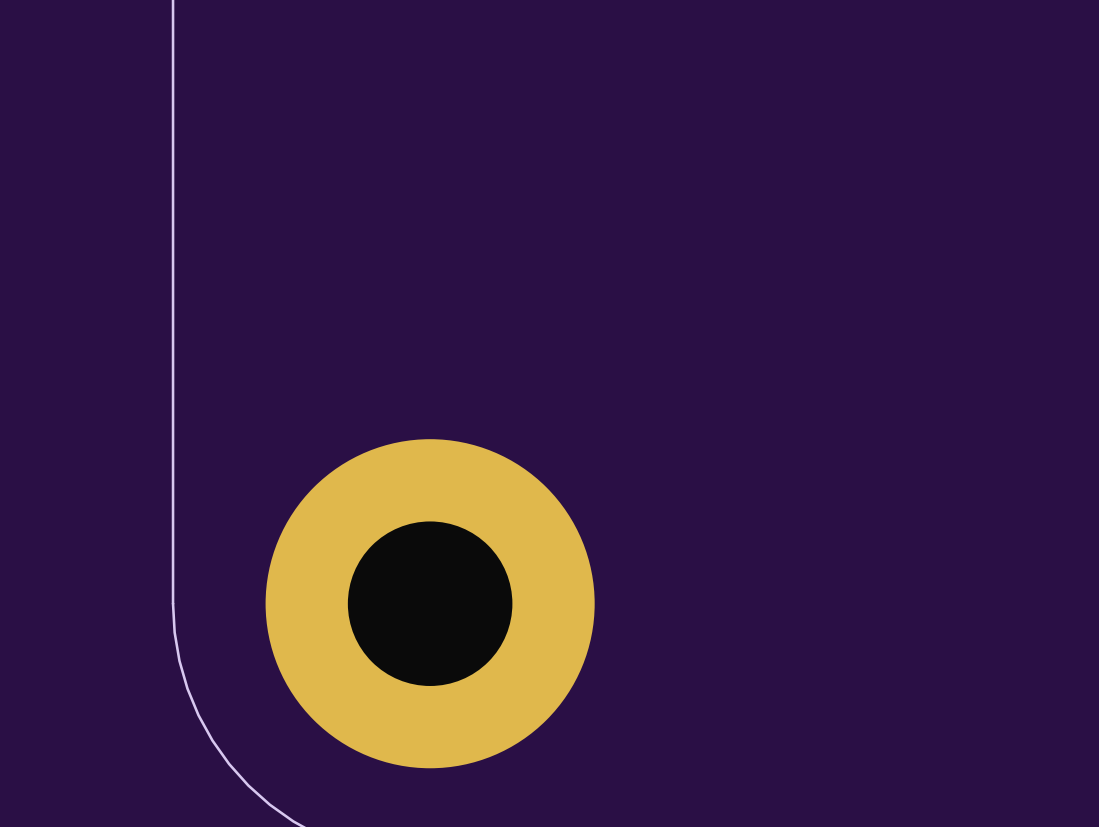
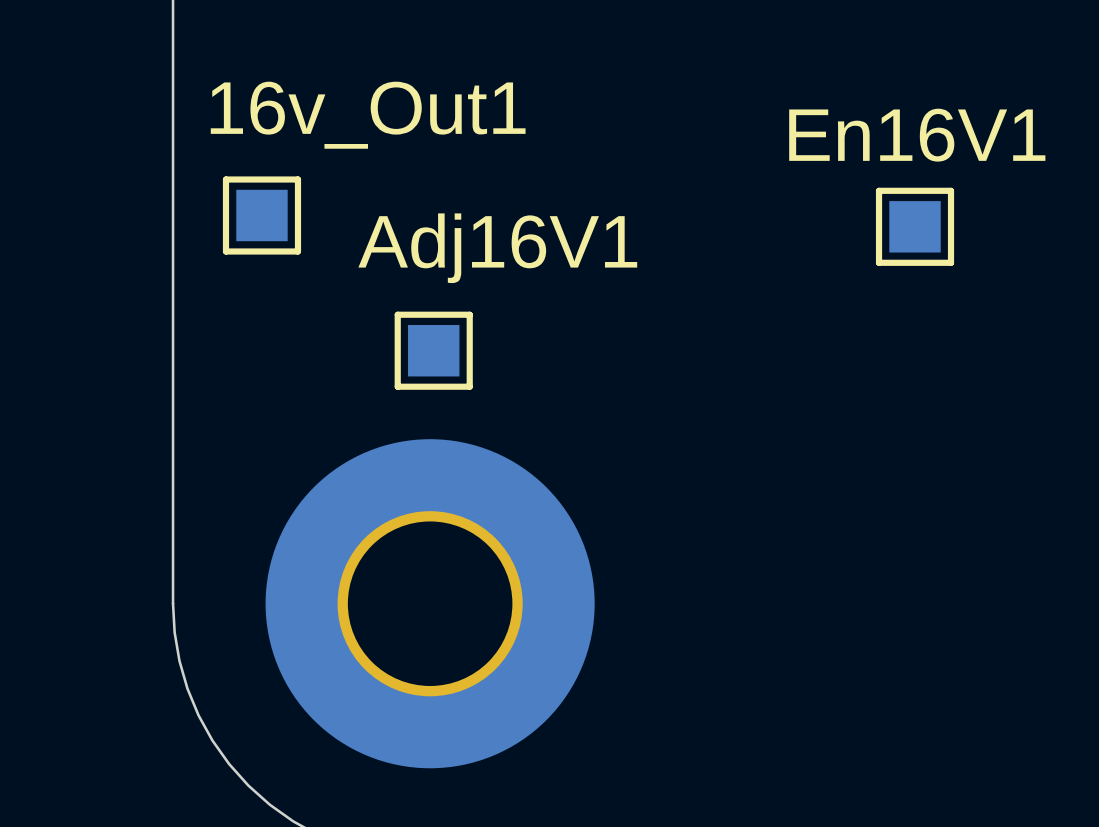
16v_Out1: none -> (261, 215)
En16V1: none -> (915, 226)
Adj16V1: none -> (433, 350)

